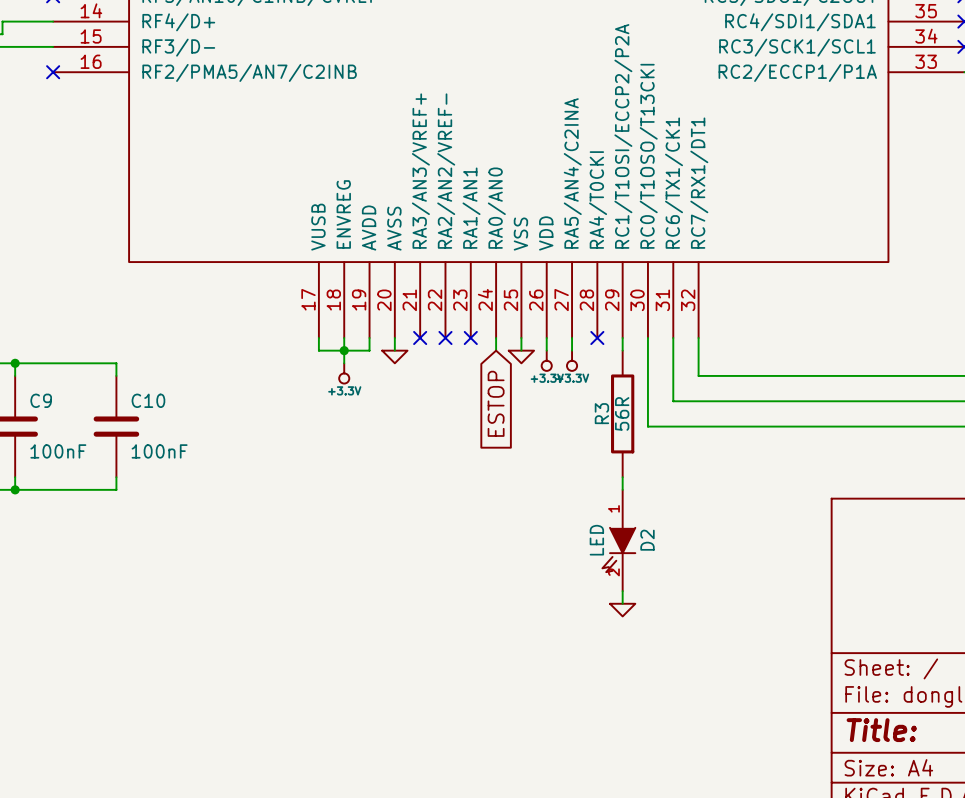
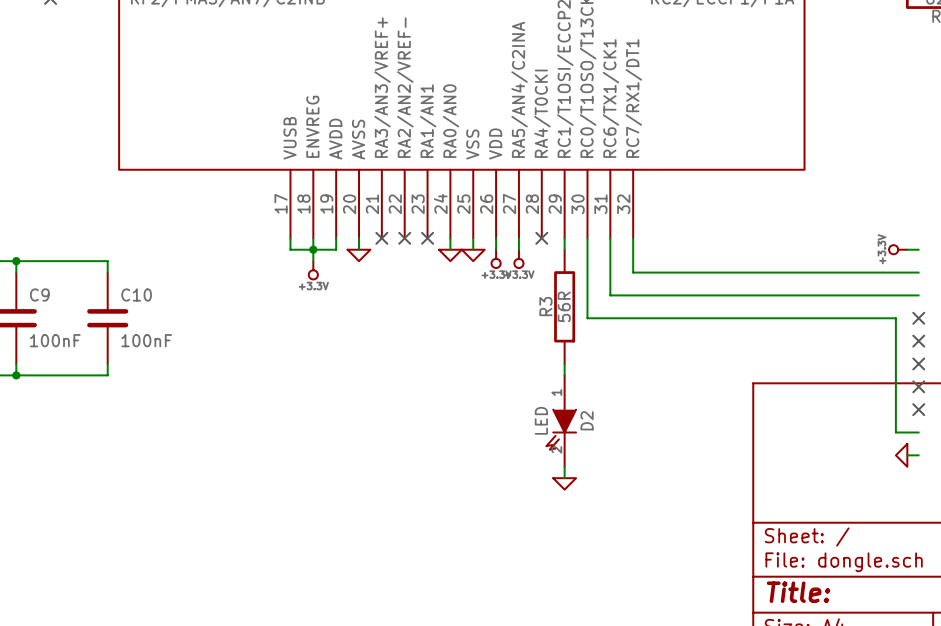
power symbol: none -> (450, 255)
global label: ESTOP (496, 403) -> none

